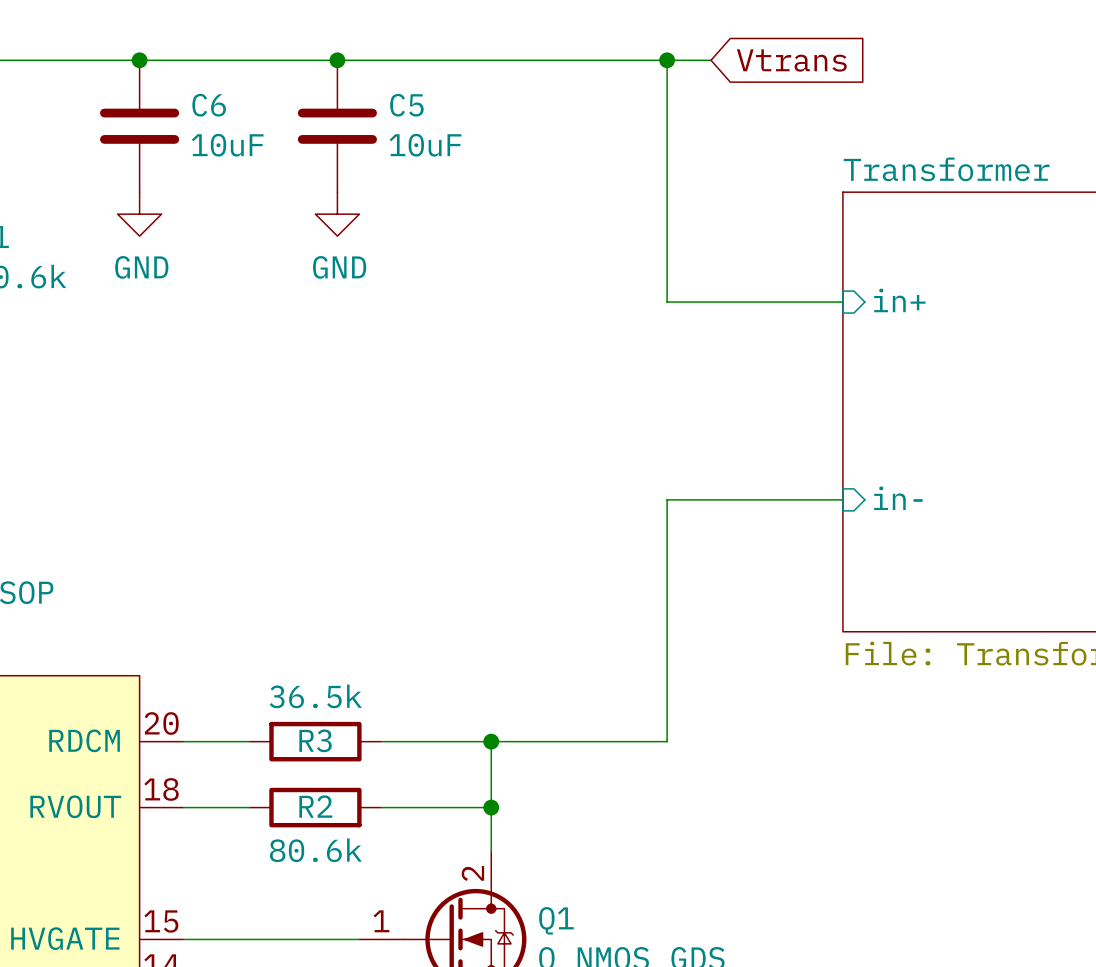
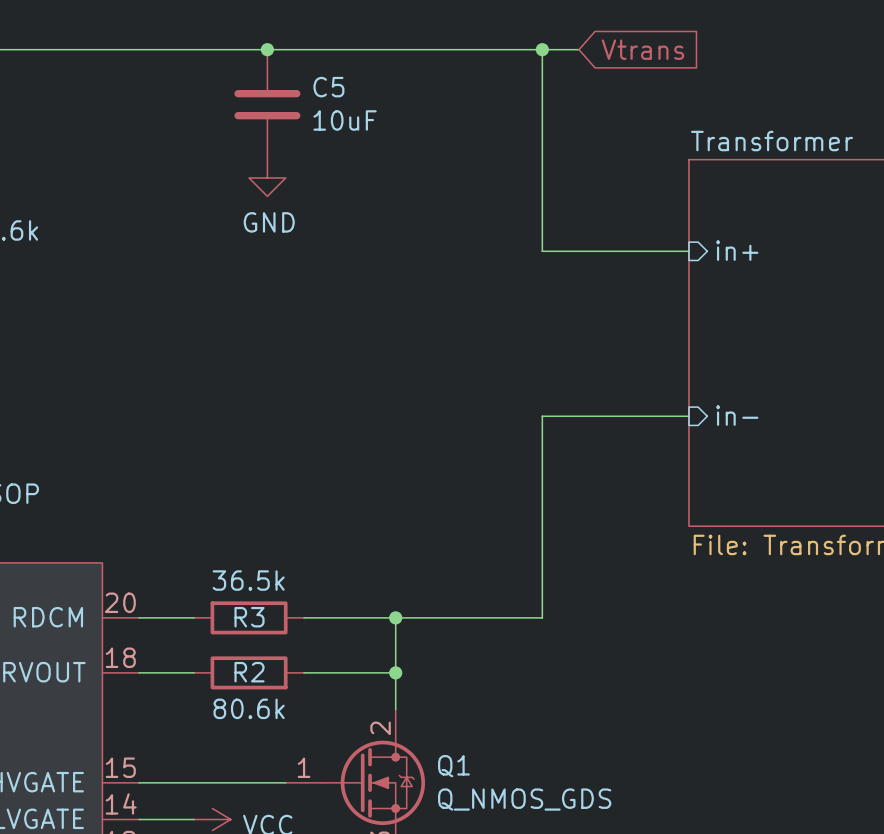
junction: (139, 60) -> none
C6: 10uF (139, 126) -> none
power symbol: GND (139, 214) -> none

